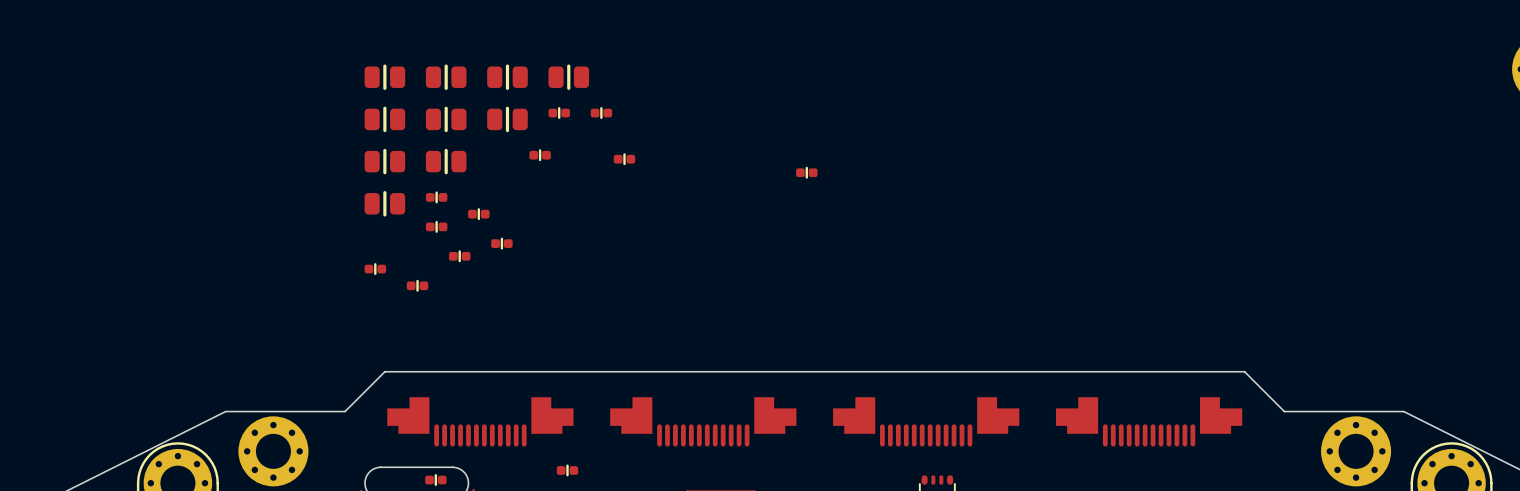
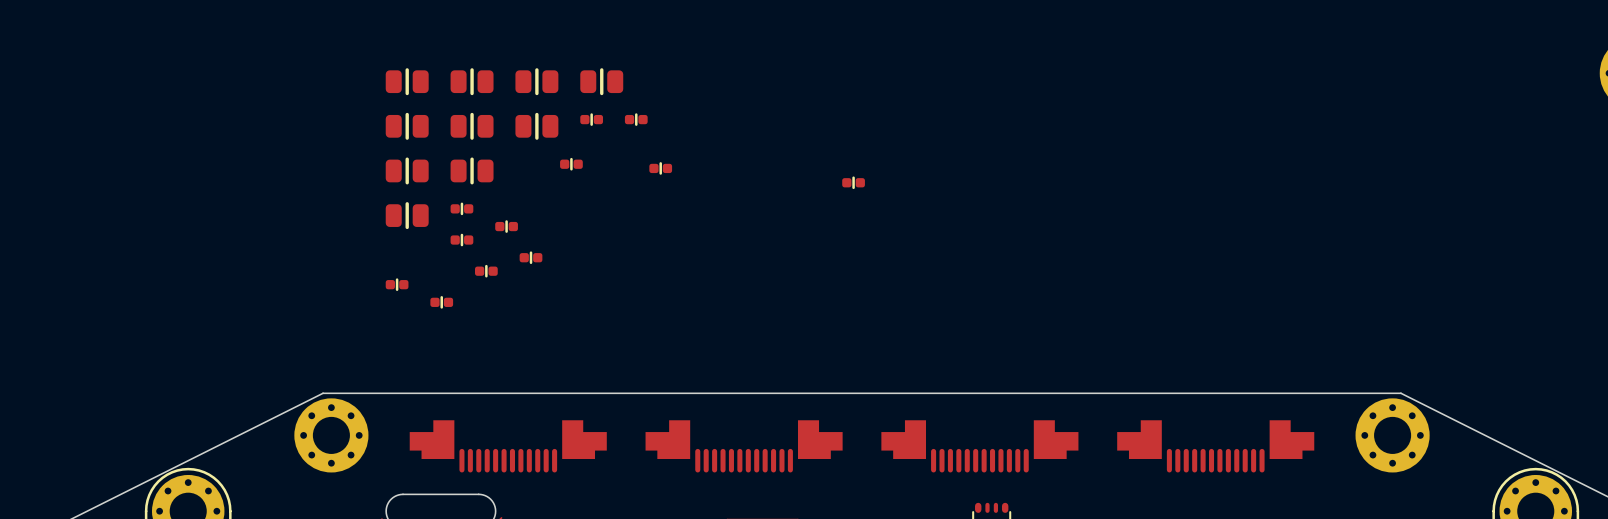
board edge: (384, 371) (345, 411) (225, 411) -> (407, 393) (322, 393) (238, 435)
board edge: (1244, 371) (1284, 411) (1403, 411) -> (1316, 393) (1401, 393) (1485, 435)
part position: (273, 451) -> (331, 435)
part position: (1356, 451) -> (1392, 435)
part: (567, 470) -> none
part: (435, 480) -> none

